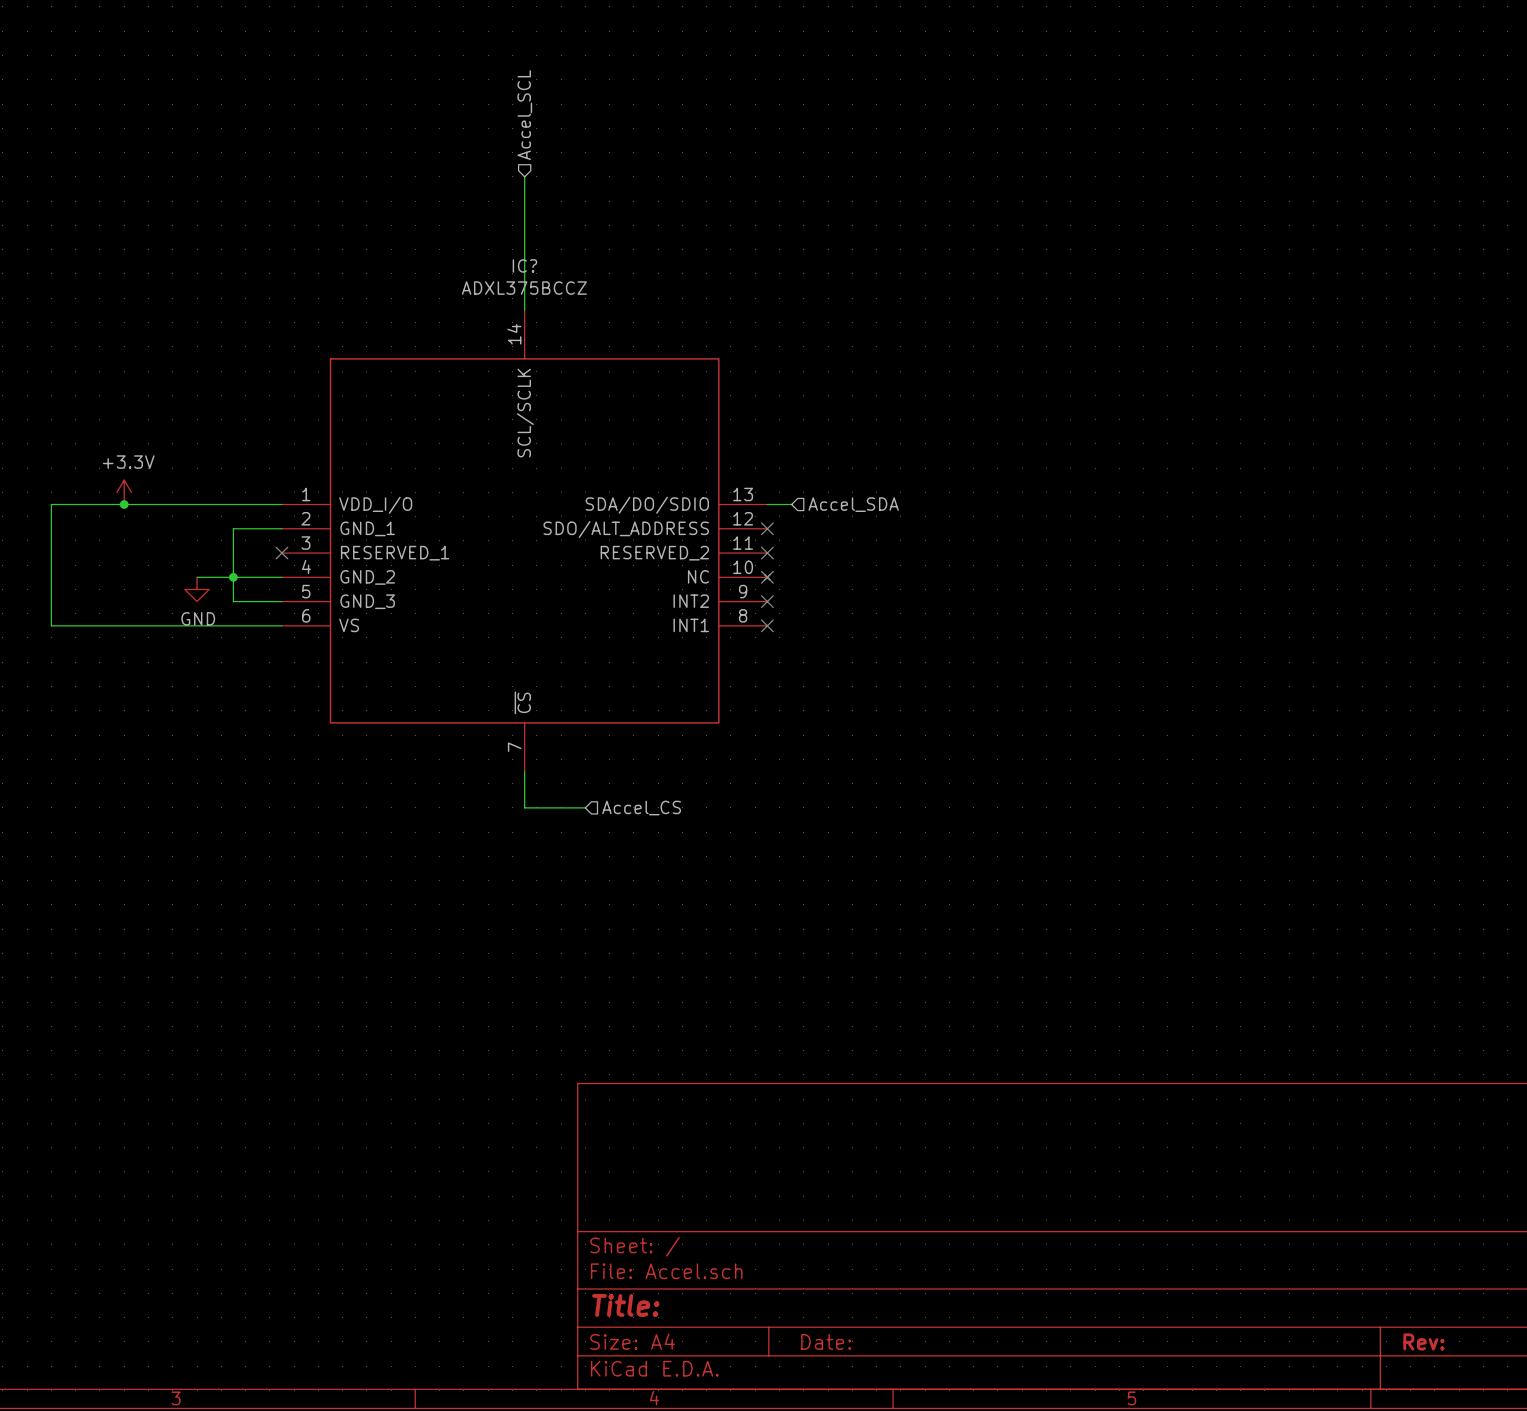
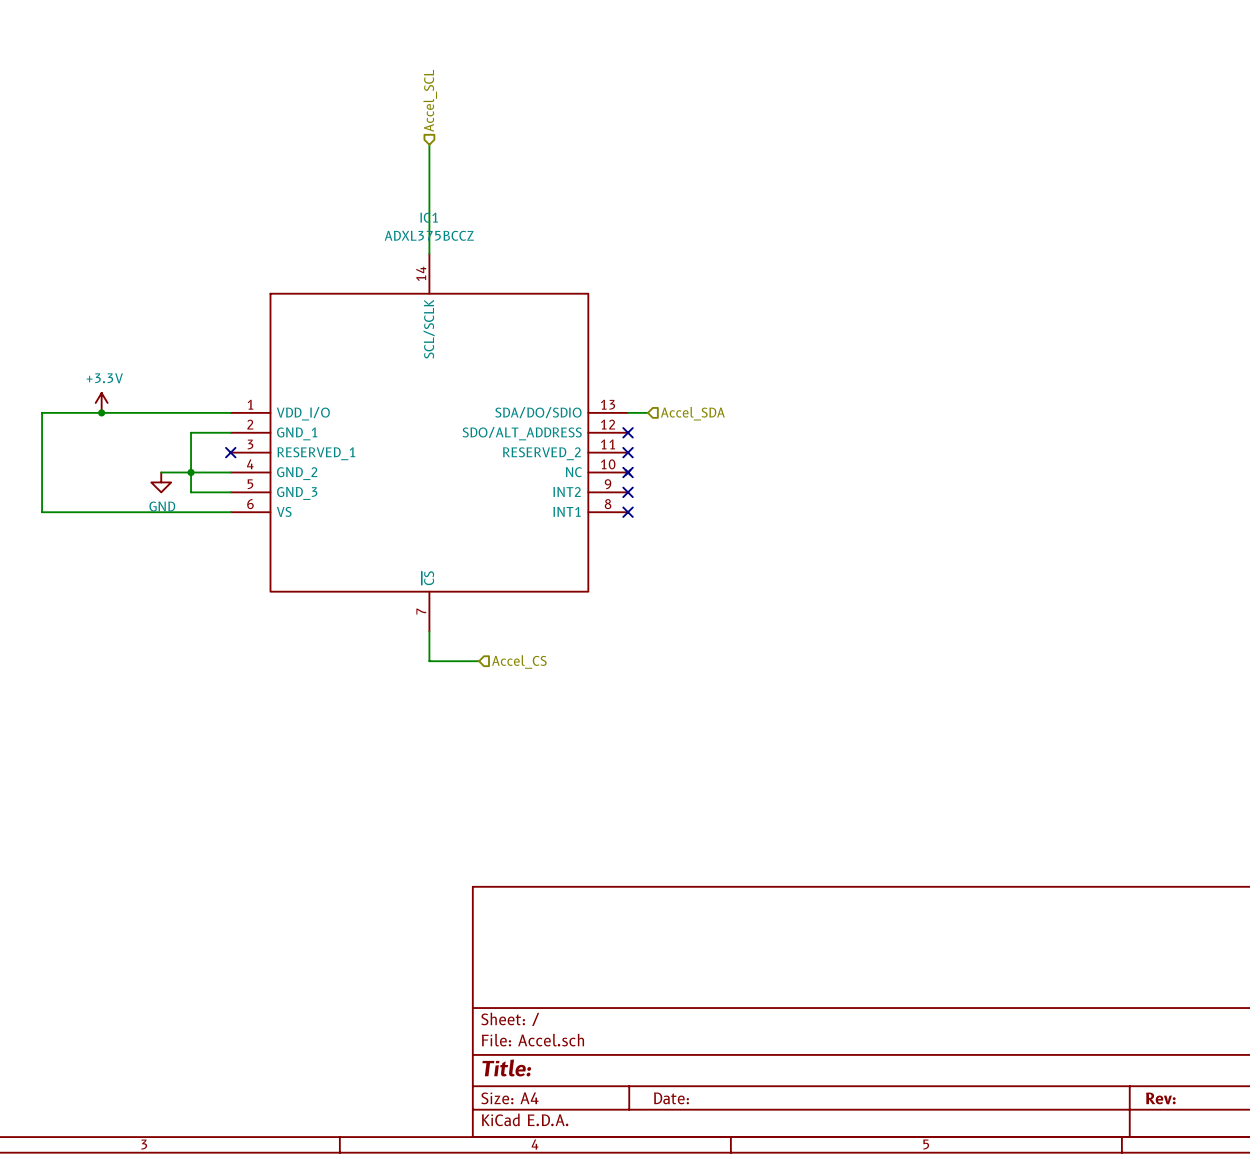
IC? name: IC? (524, 265) -> IC1 (429, 217)

